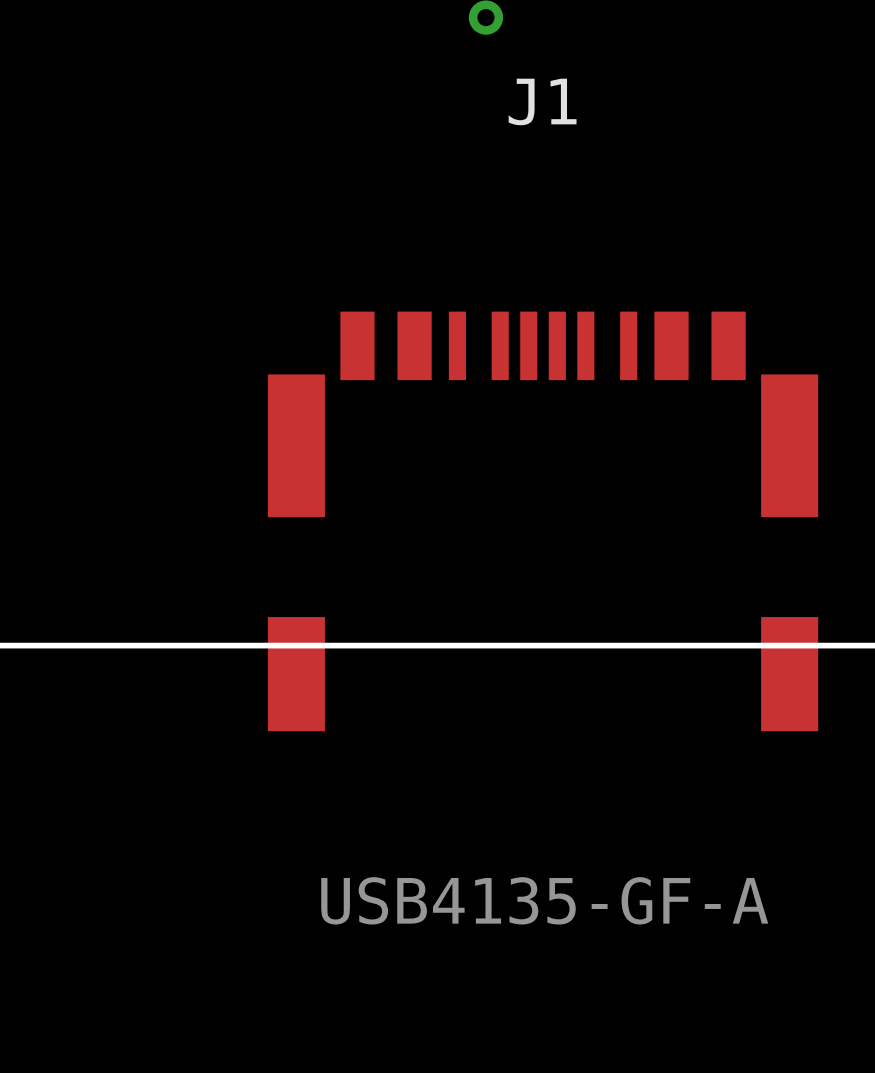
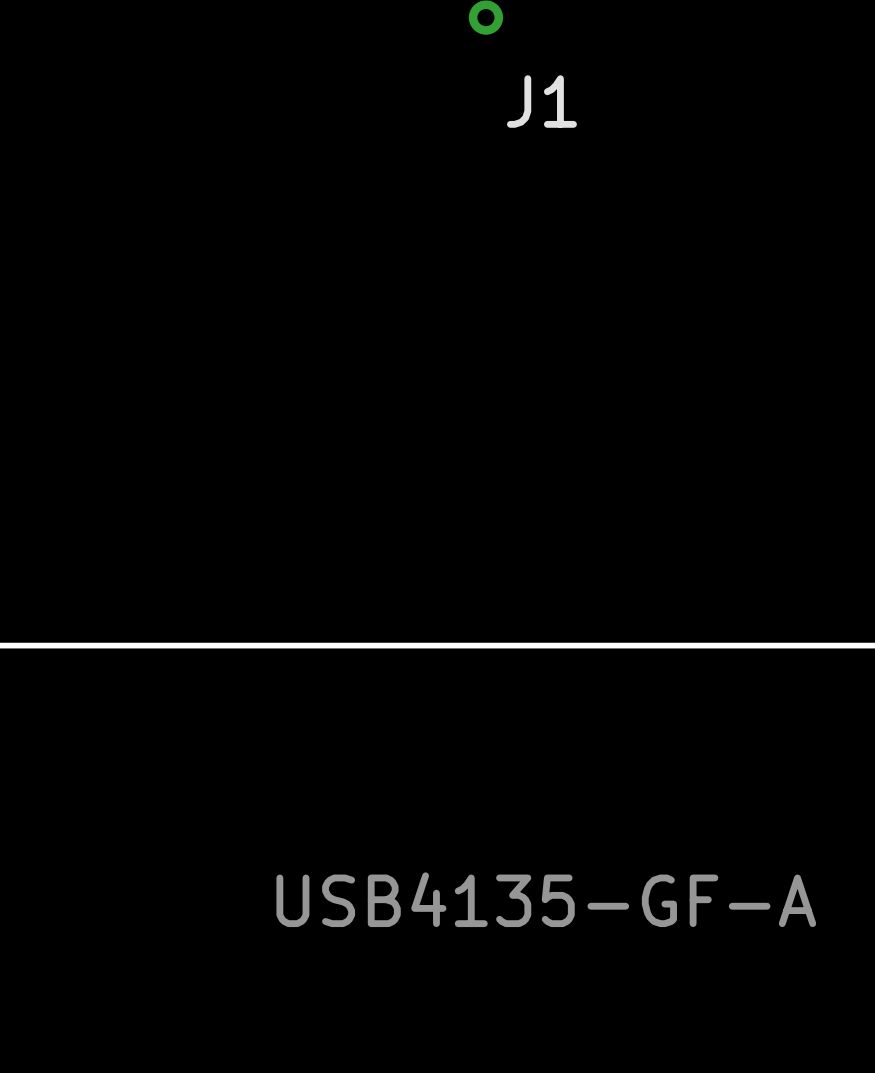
J1 footprint: [267, 311, 819, 732] -> [276, 75, 817, 928]

